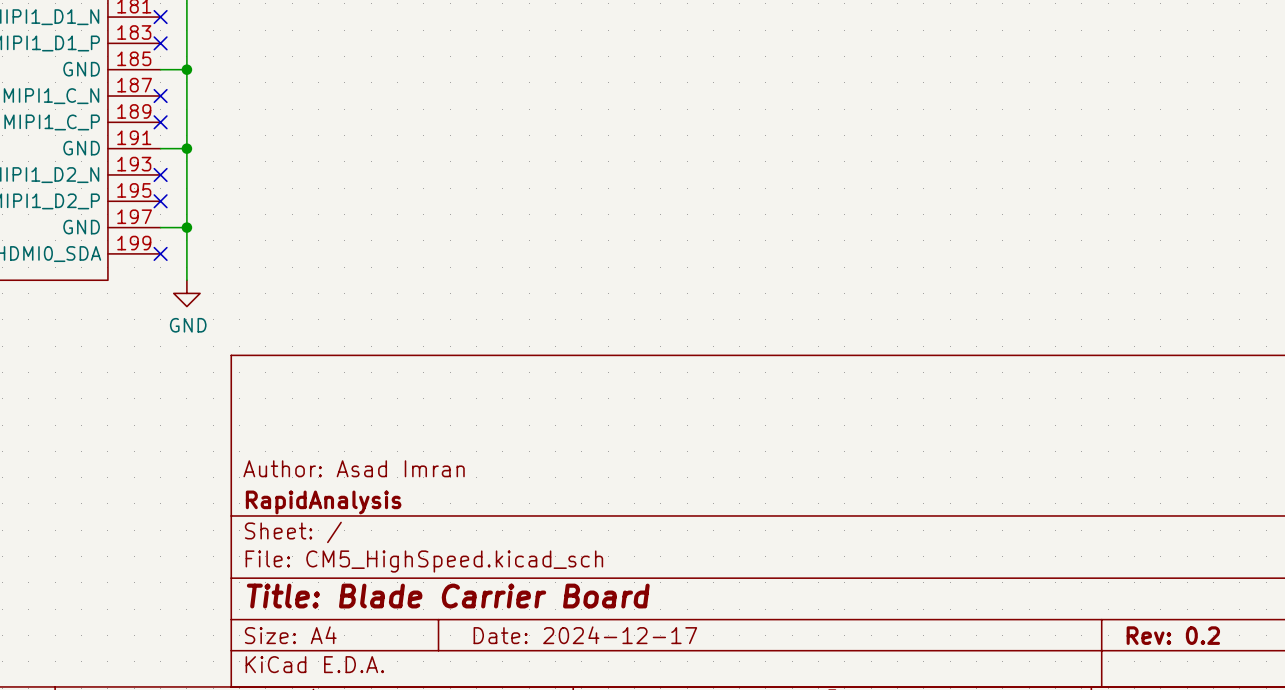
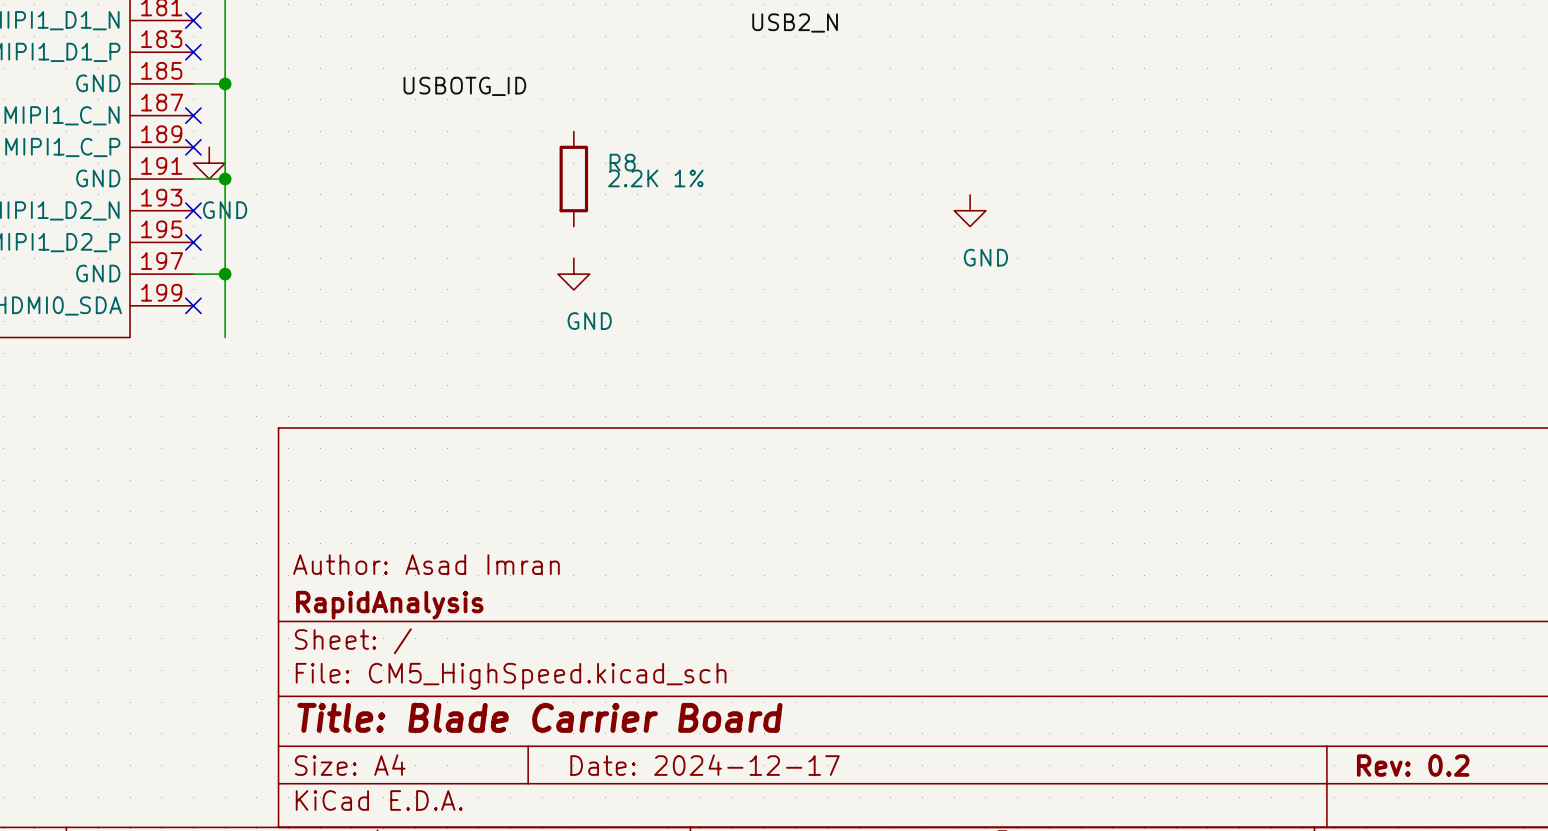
label: none -> USB2_N (795, 22)
label: none -> USBOTG_ID (464, 86)
power symbol: none -> GND (209, 163)
R8: none -> 2.2K 1% (573, 179)
power symbol: none -> GND (970, 210)
power symbol: none -> GND (573, 274)
power symbol: GND (186, 293) -> none

